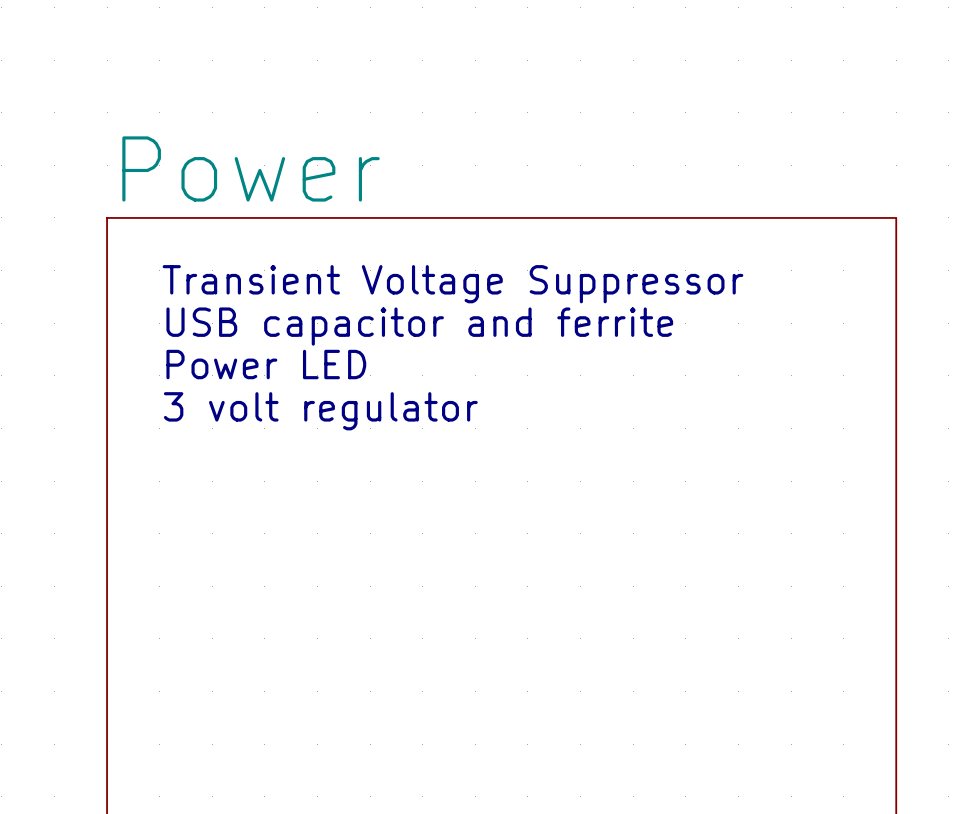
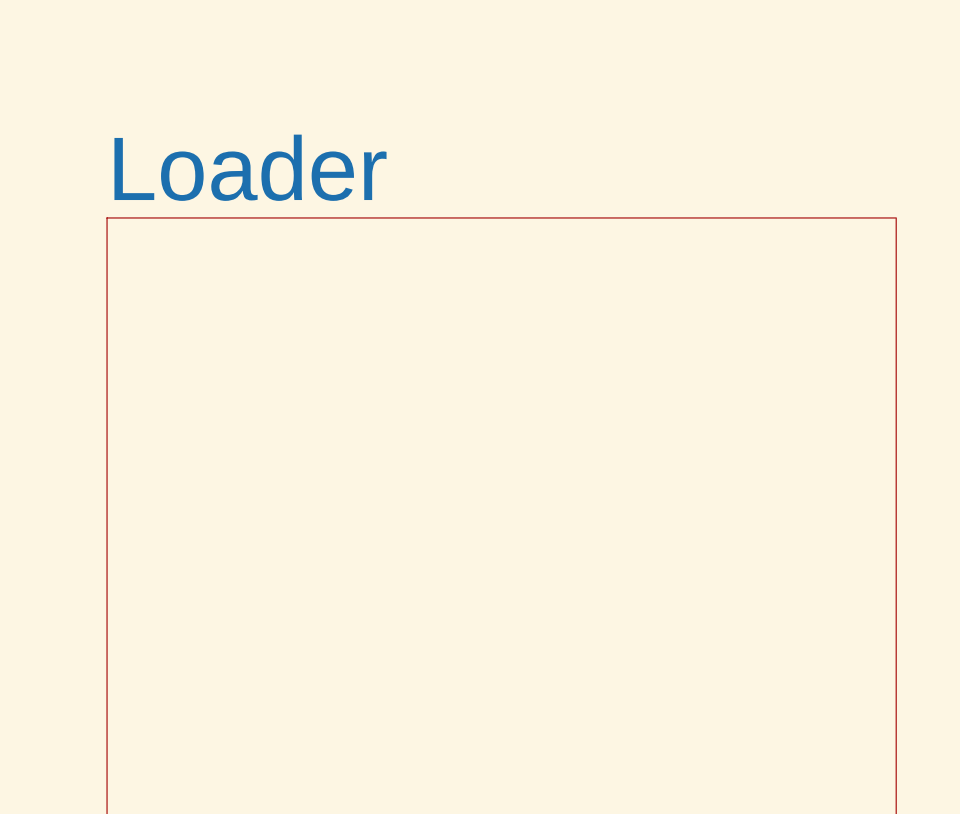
sheet Power name: Power (251, 168) -> Loader (250, 167)
text: Transient Voltage Suppressor (452, 284) -> none
text: USB capacitor and ferrite (419, 326) -> none
text: Power LED (266, 364) -> none
text: 3 volt regulator (320, 411) -> none

